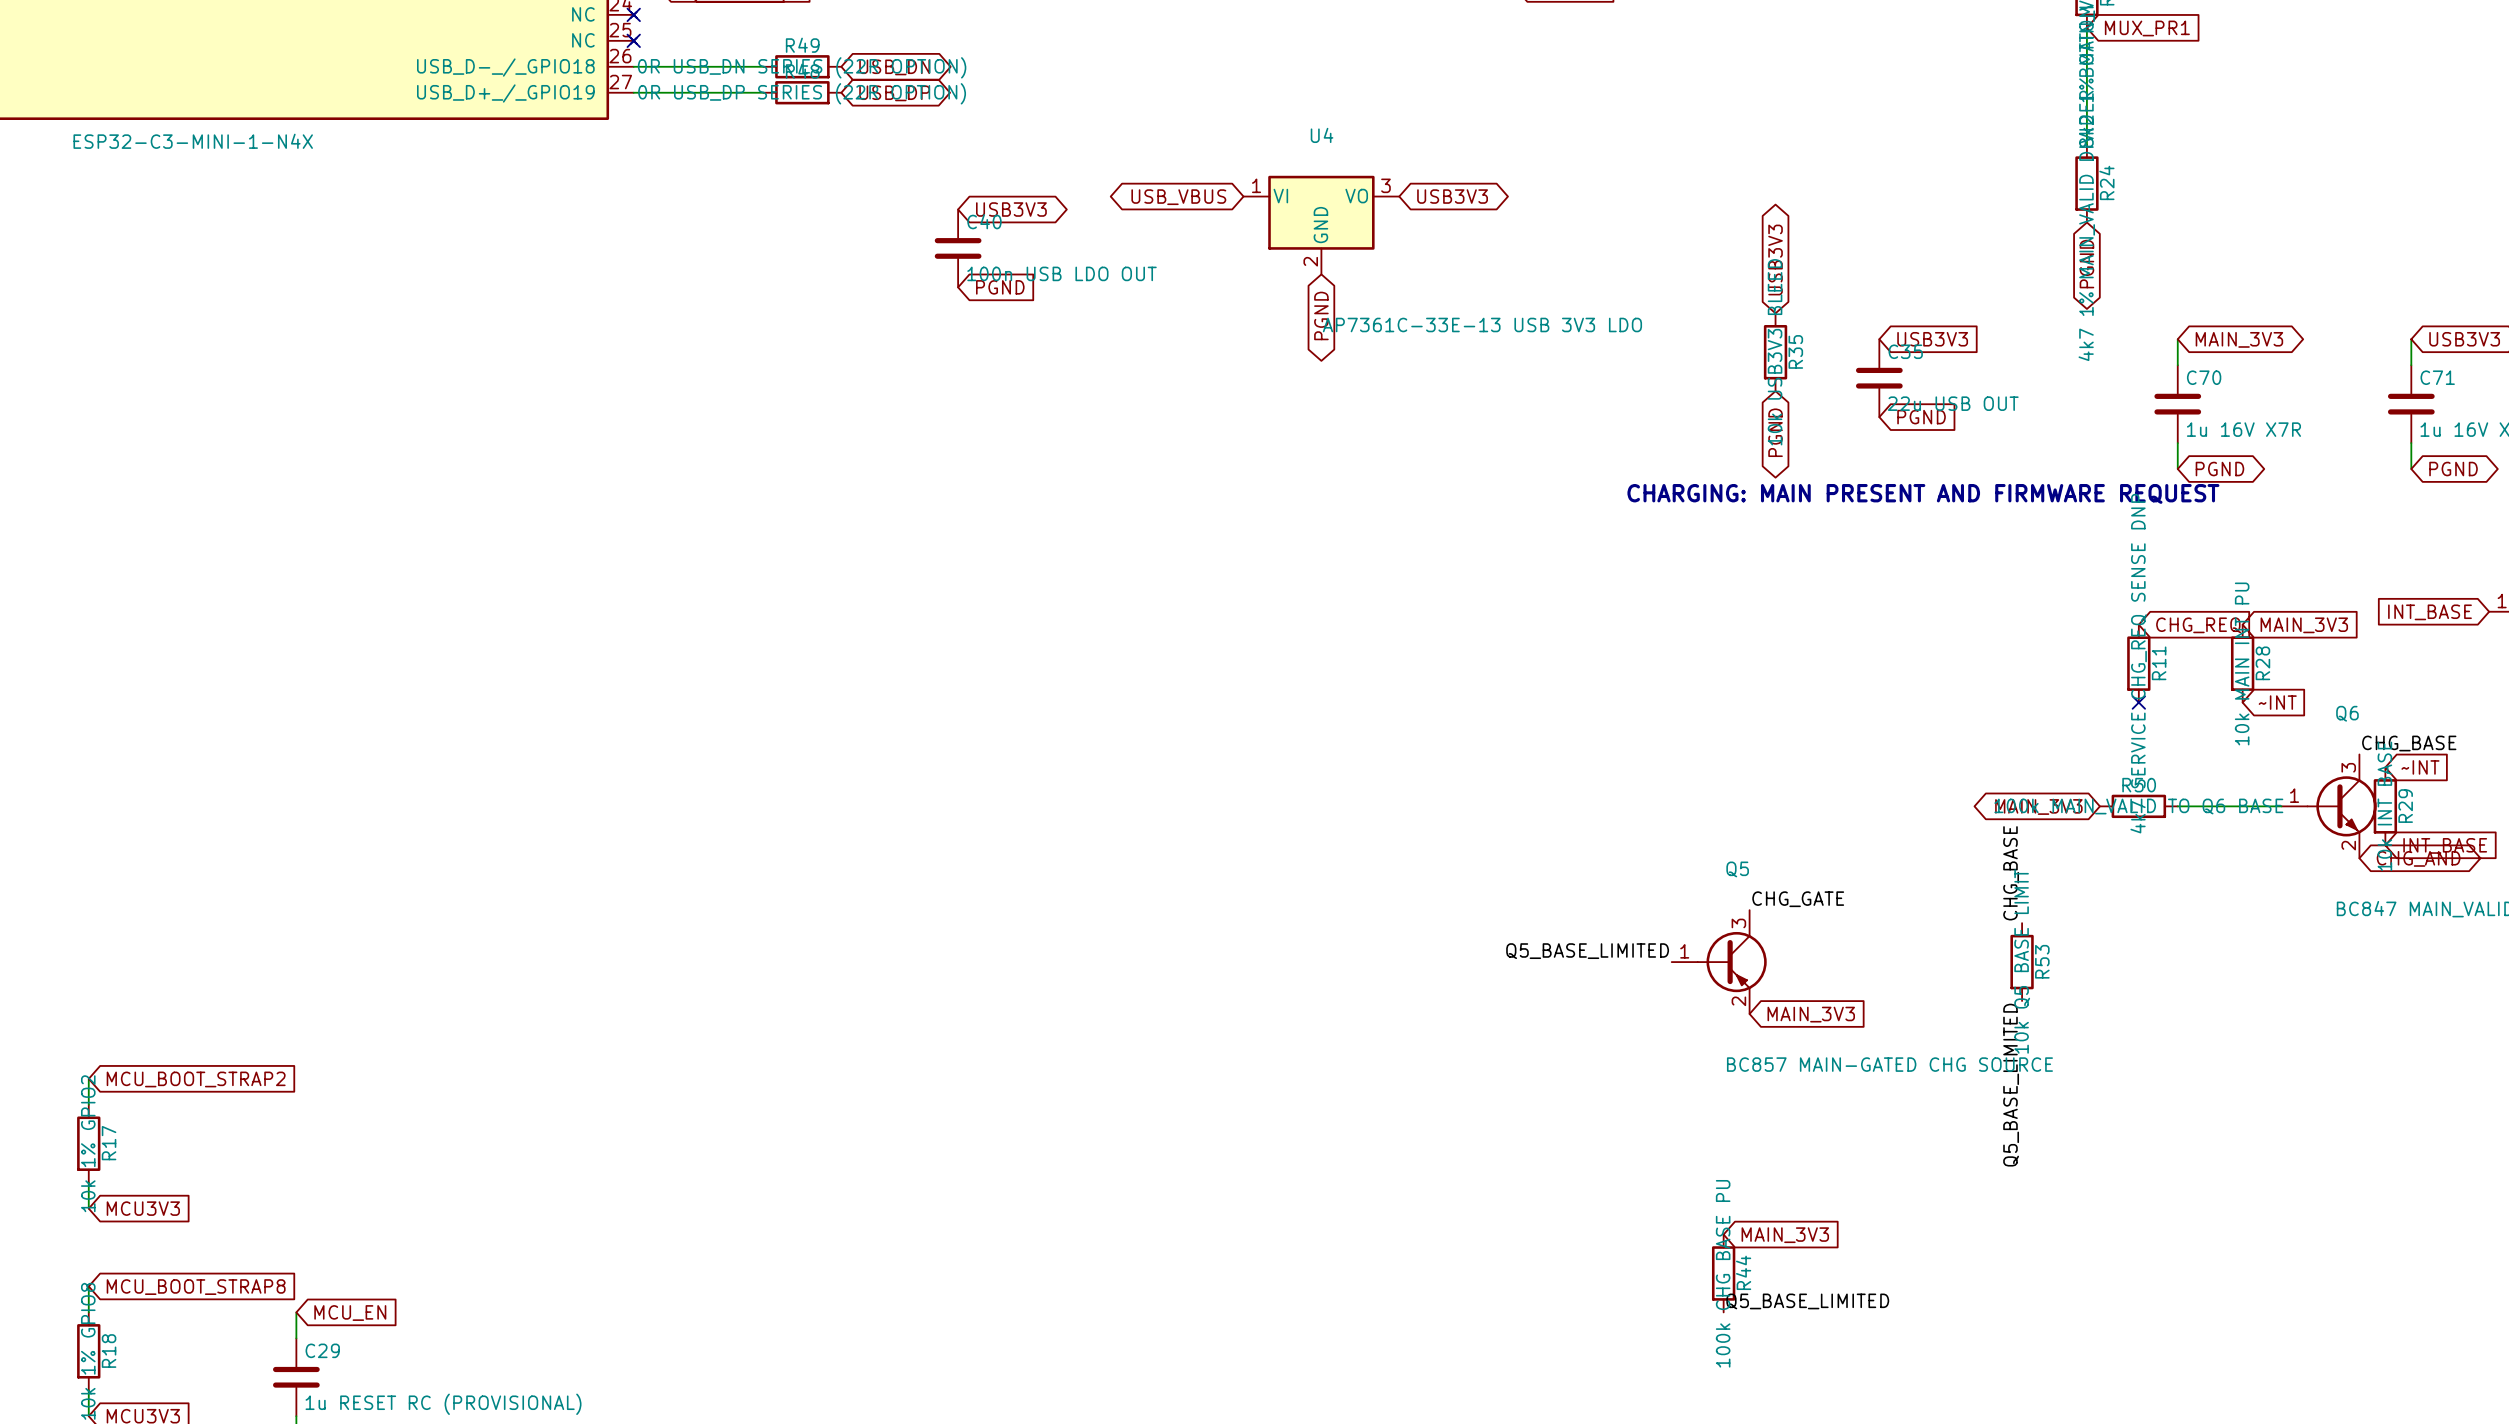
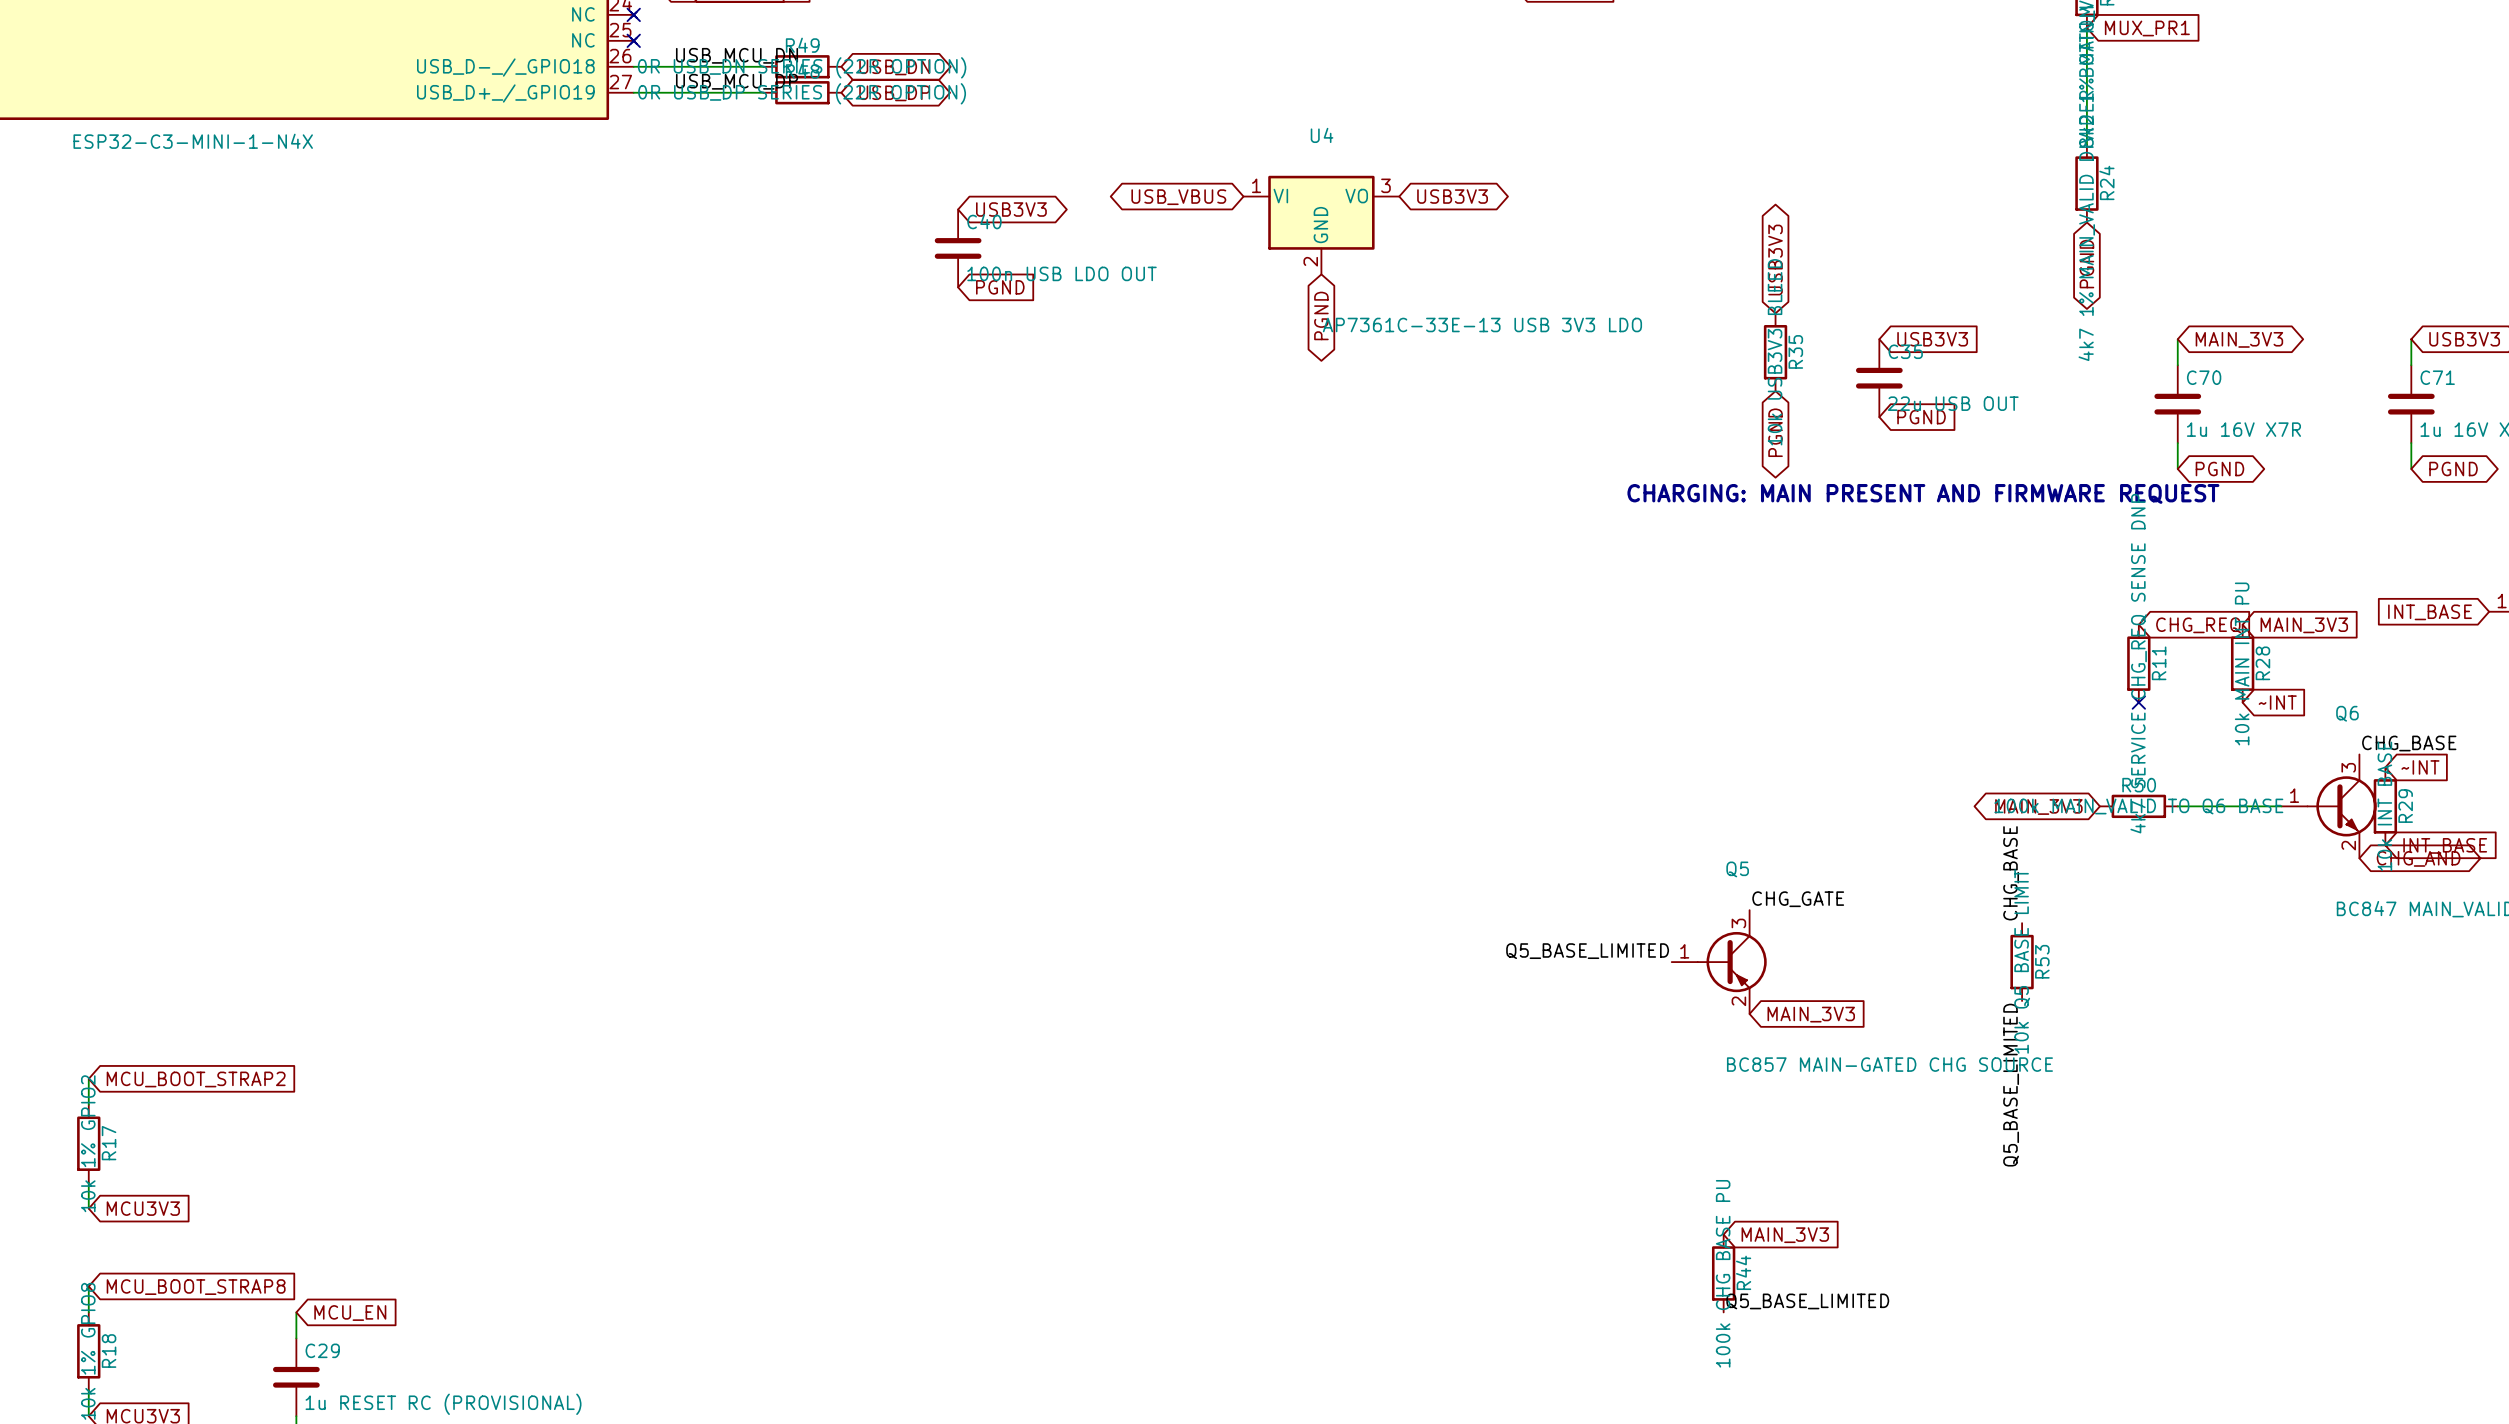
label: none -> USB_MCU_DN (737, 55)
label: none -> USB_MCU_DP (737, 81)

